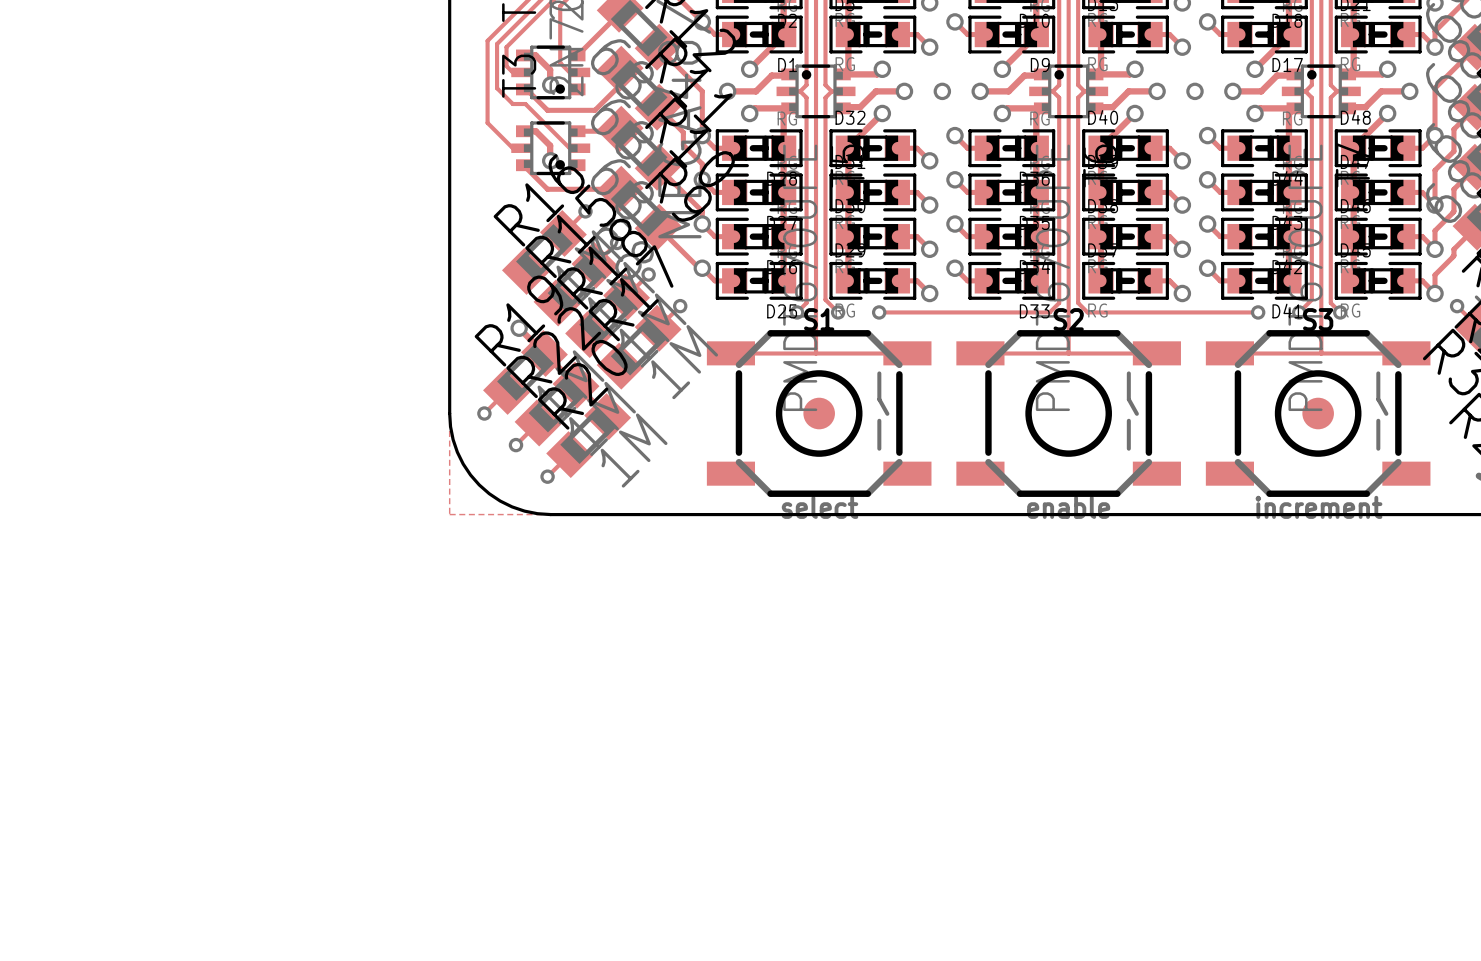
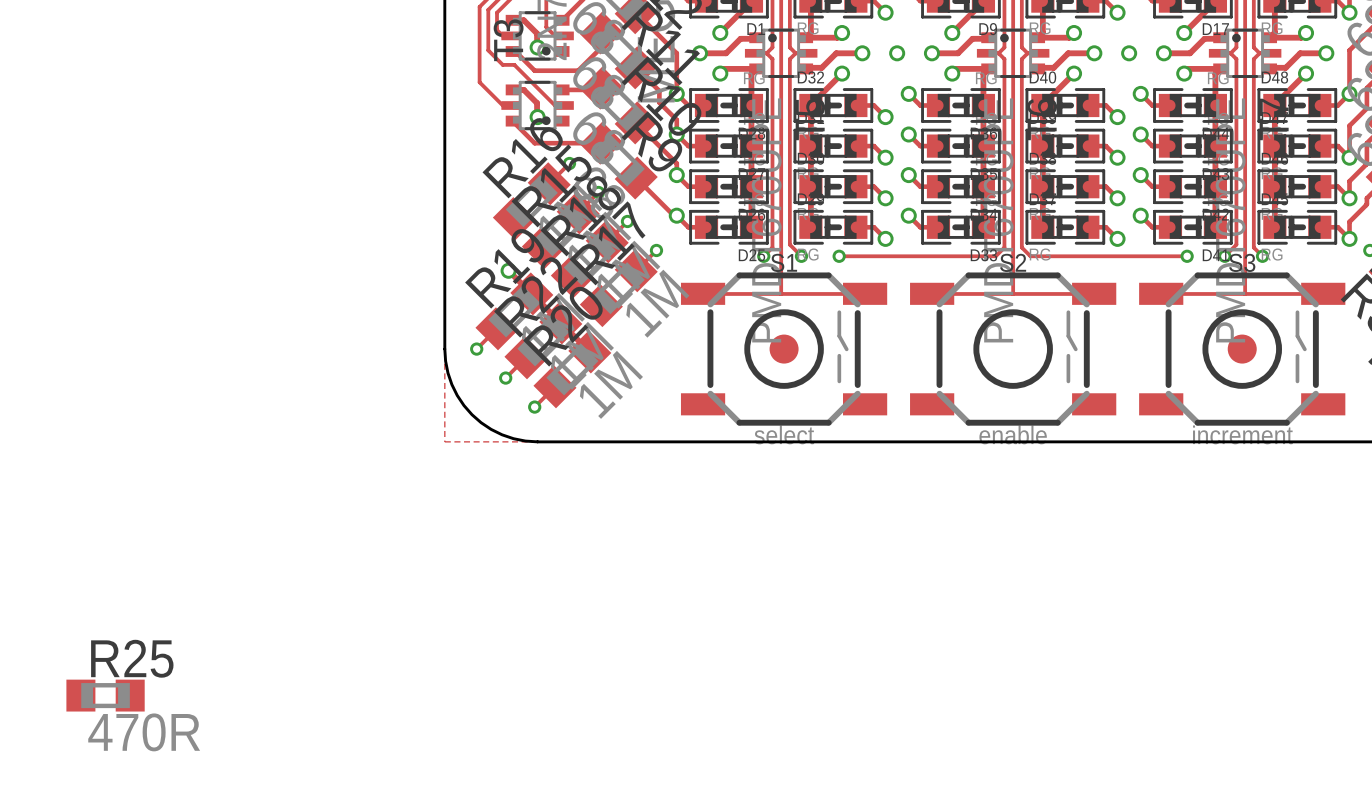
R25: none -> 470R (105, 695)

